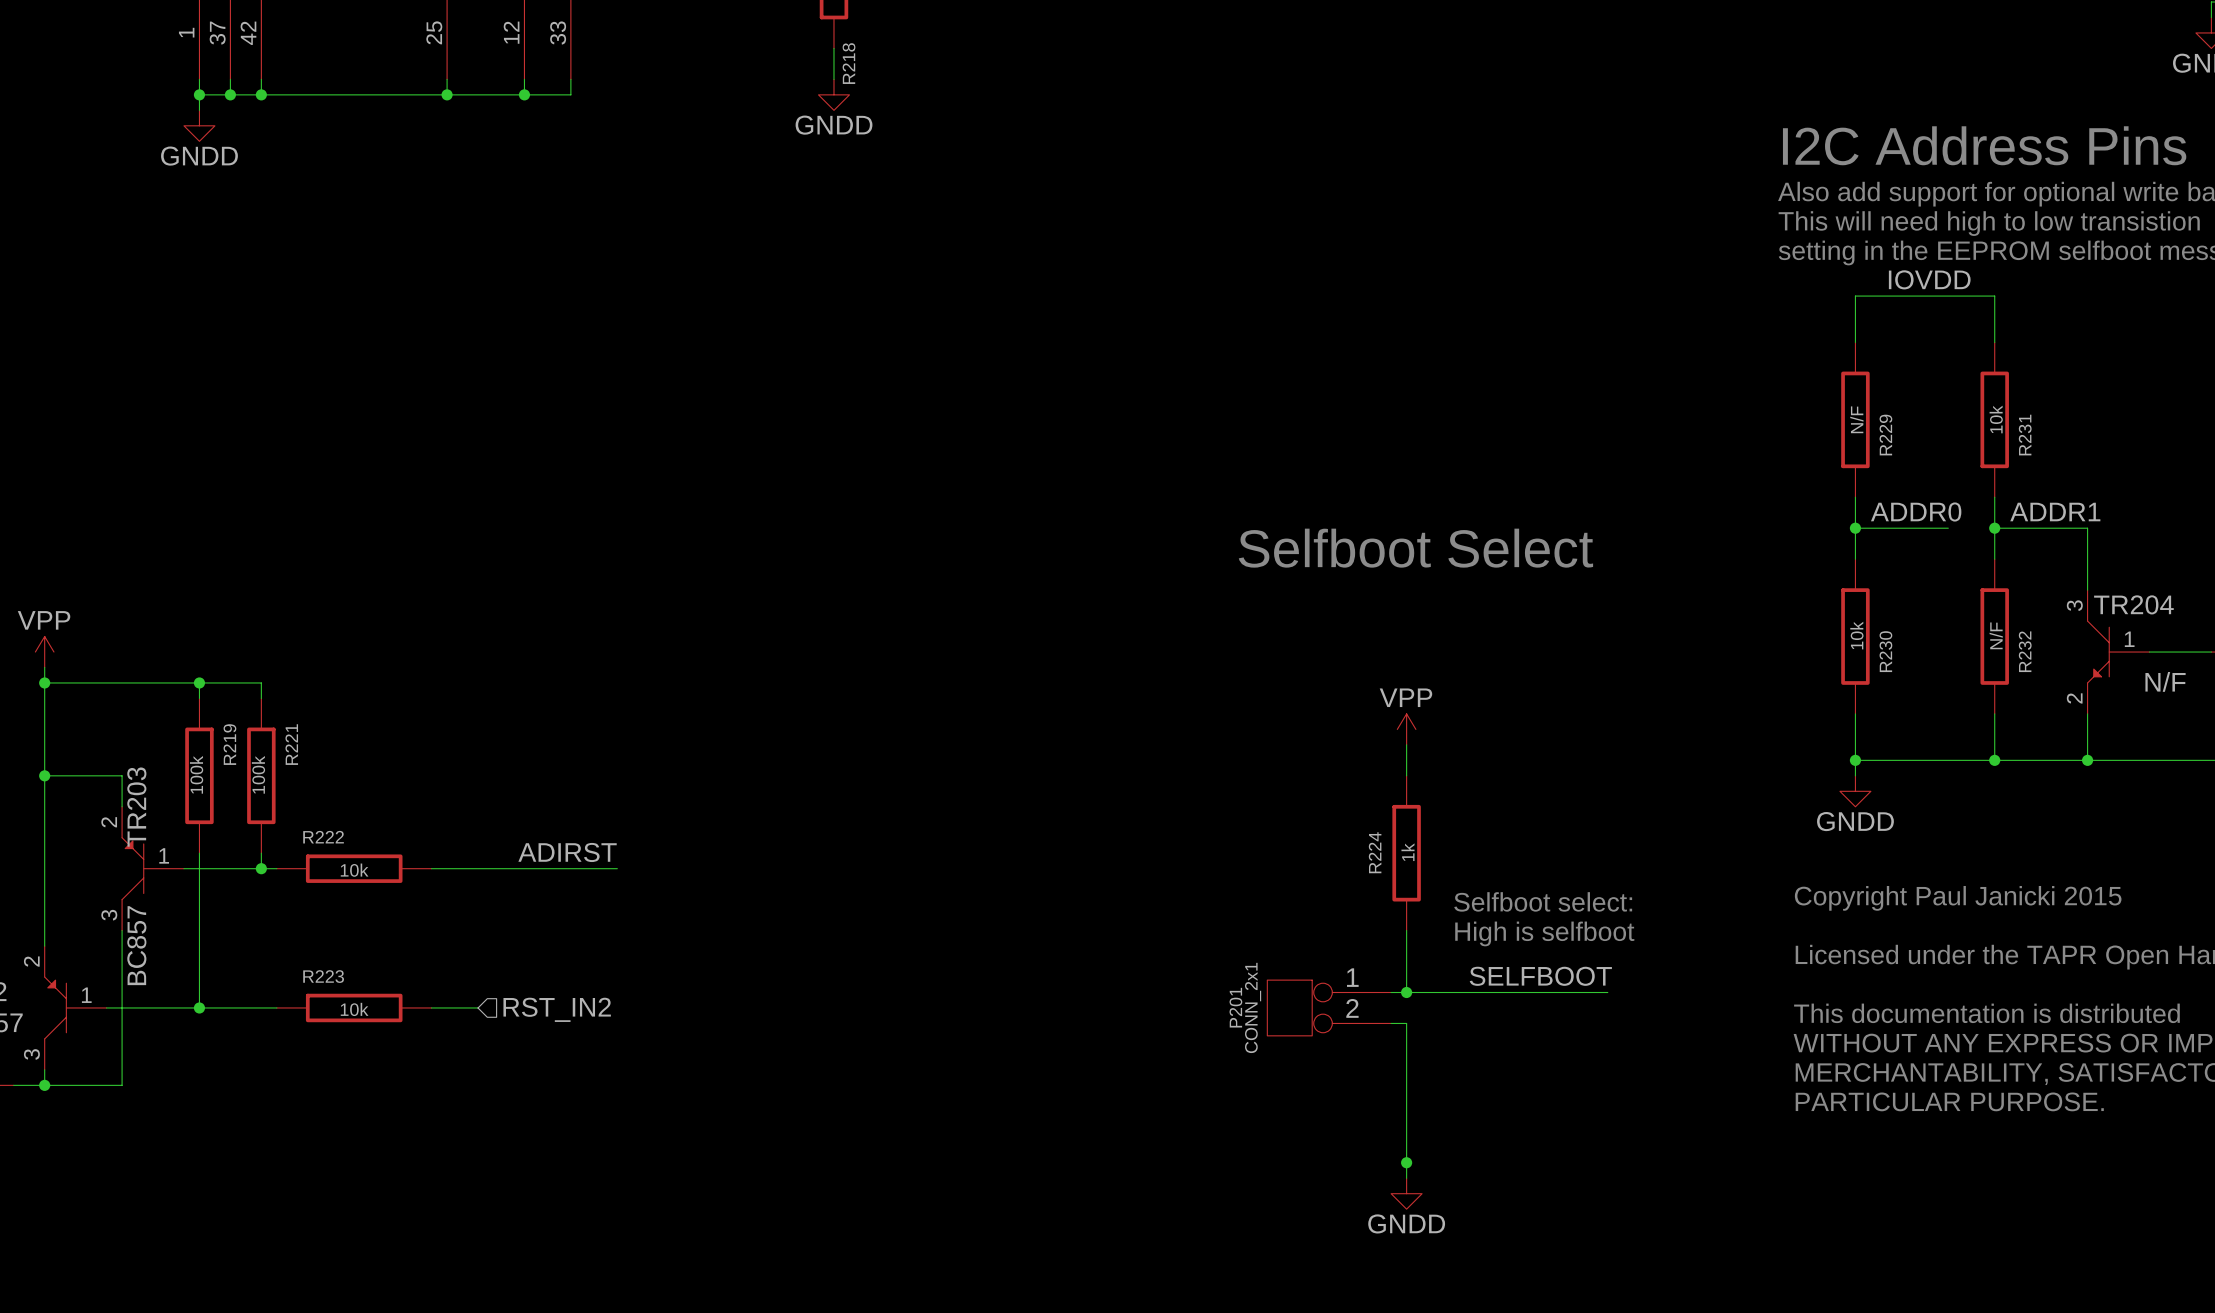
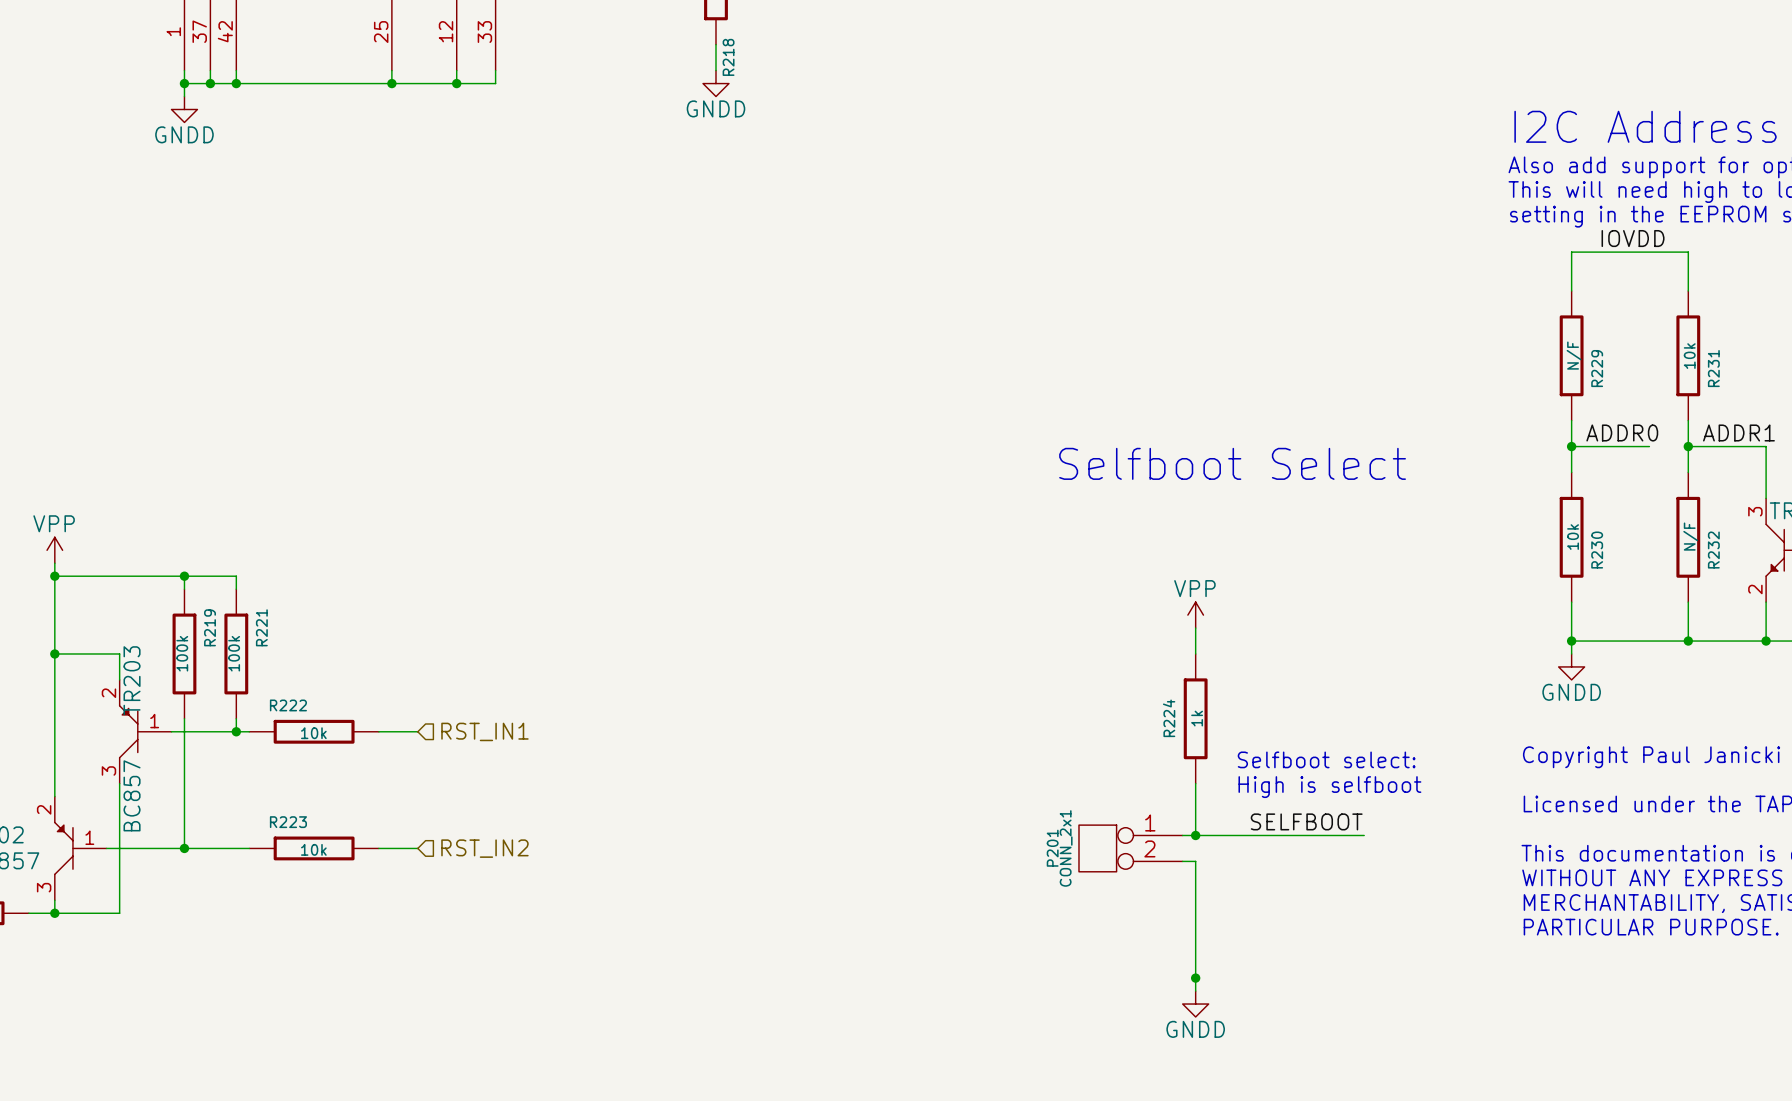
label: ADIRST (567, 852) -> none
wire: (478, 868) (617, 868) -> none
hierarchical label: none -> RST_IN1 (484, 731)

